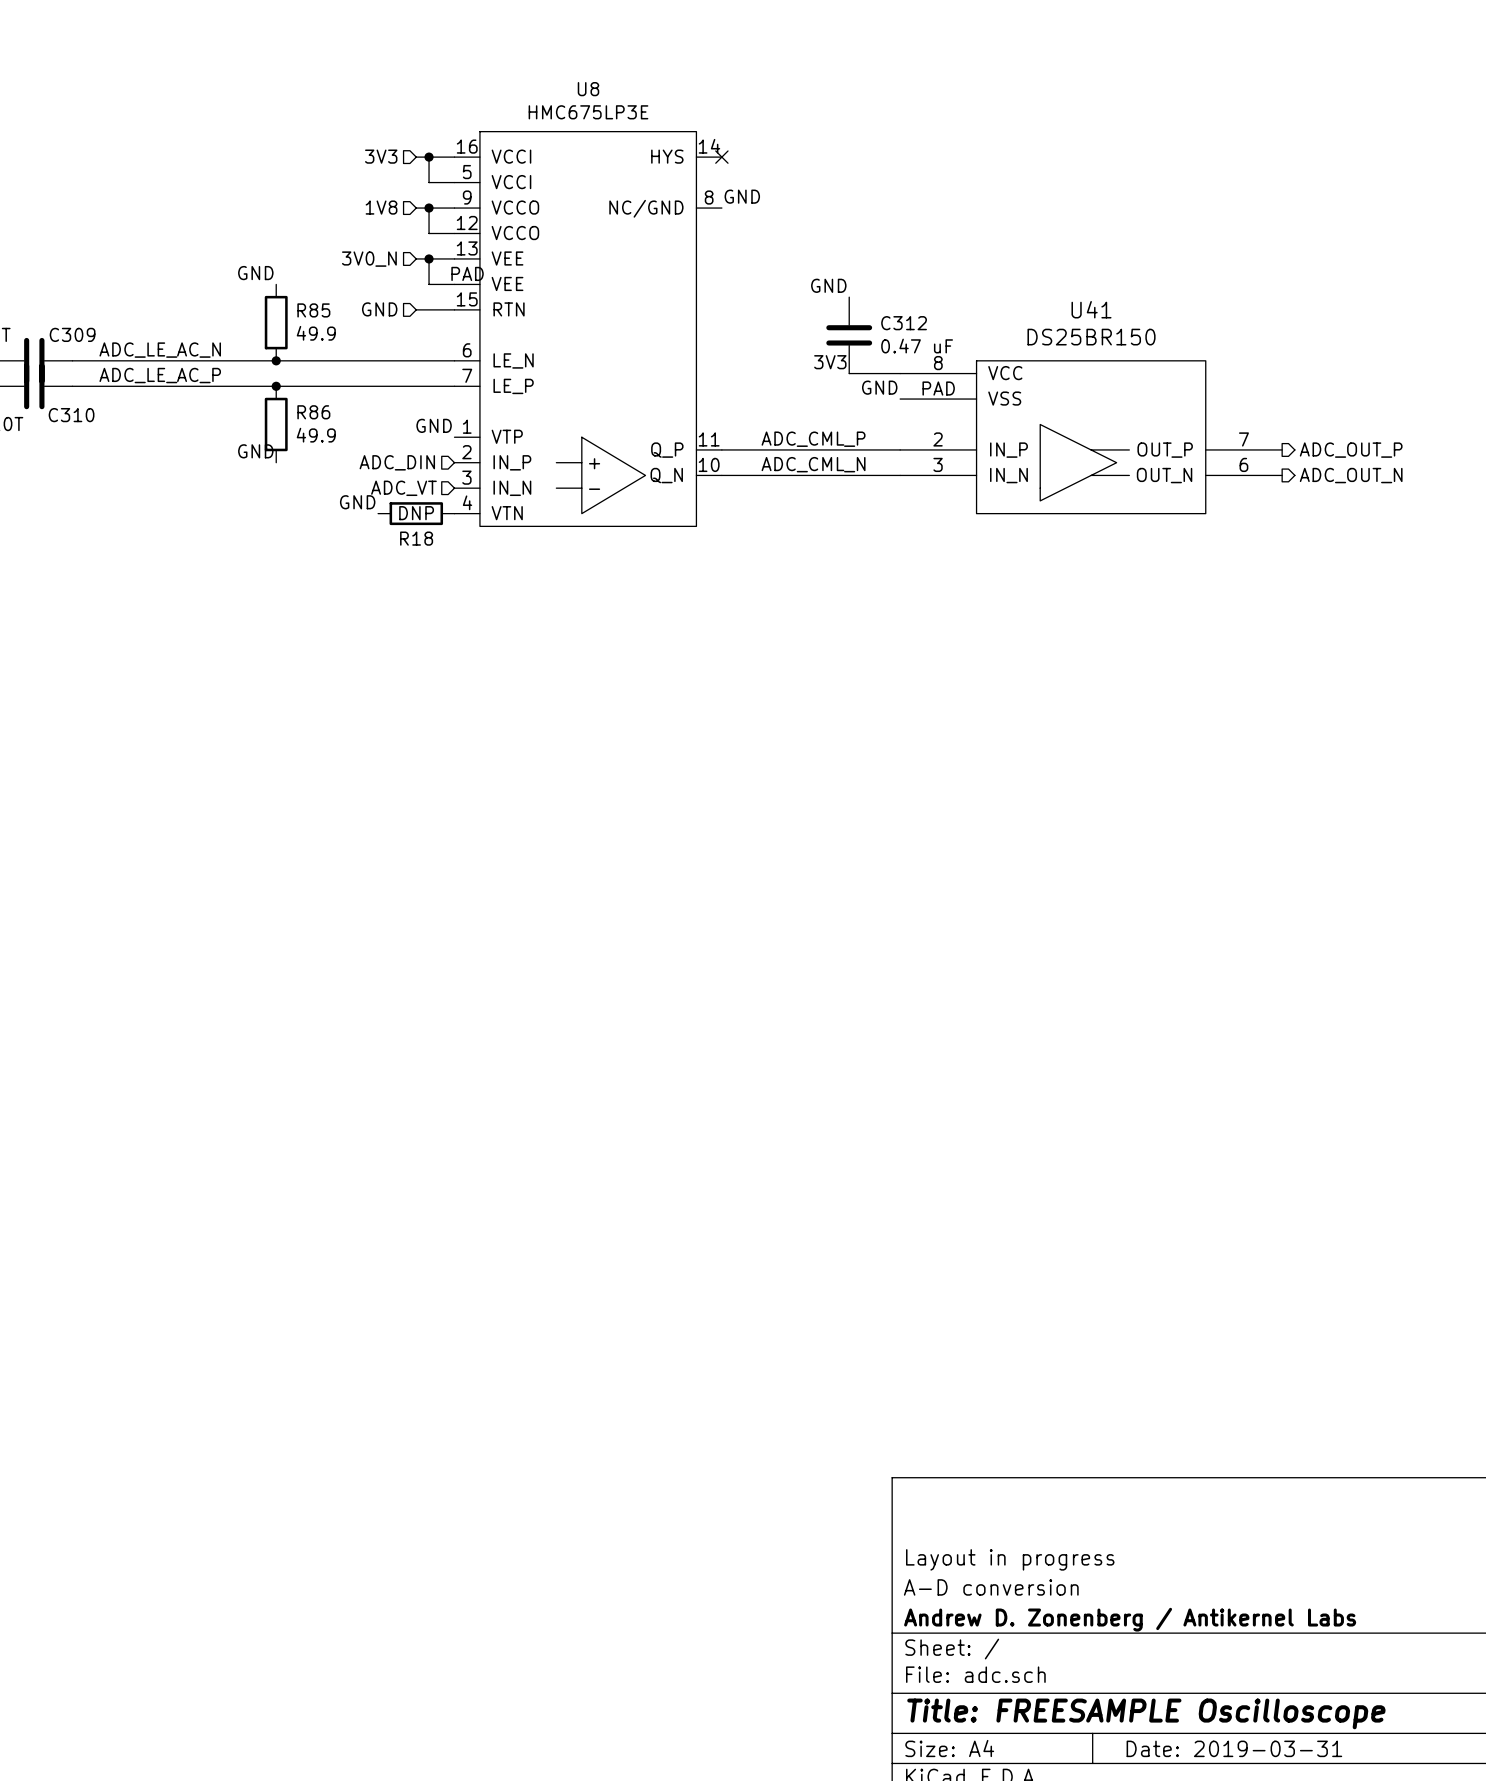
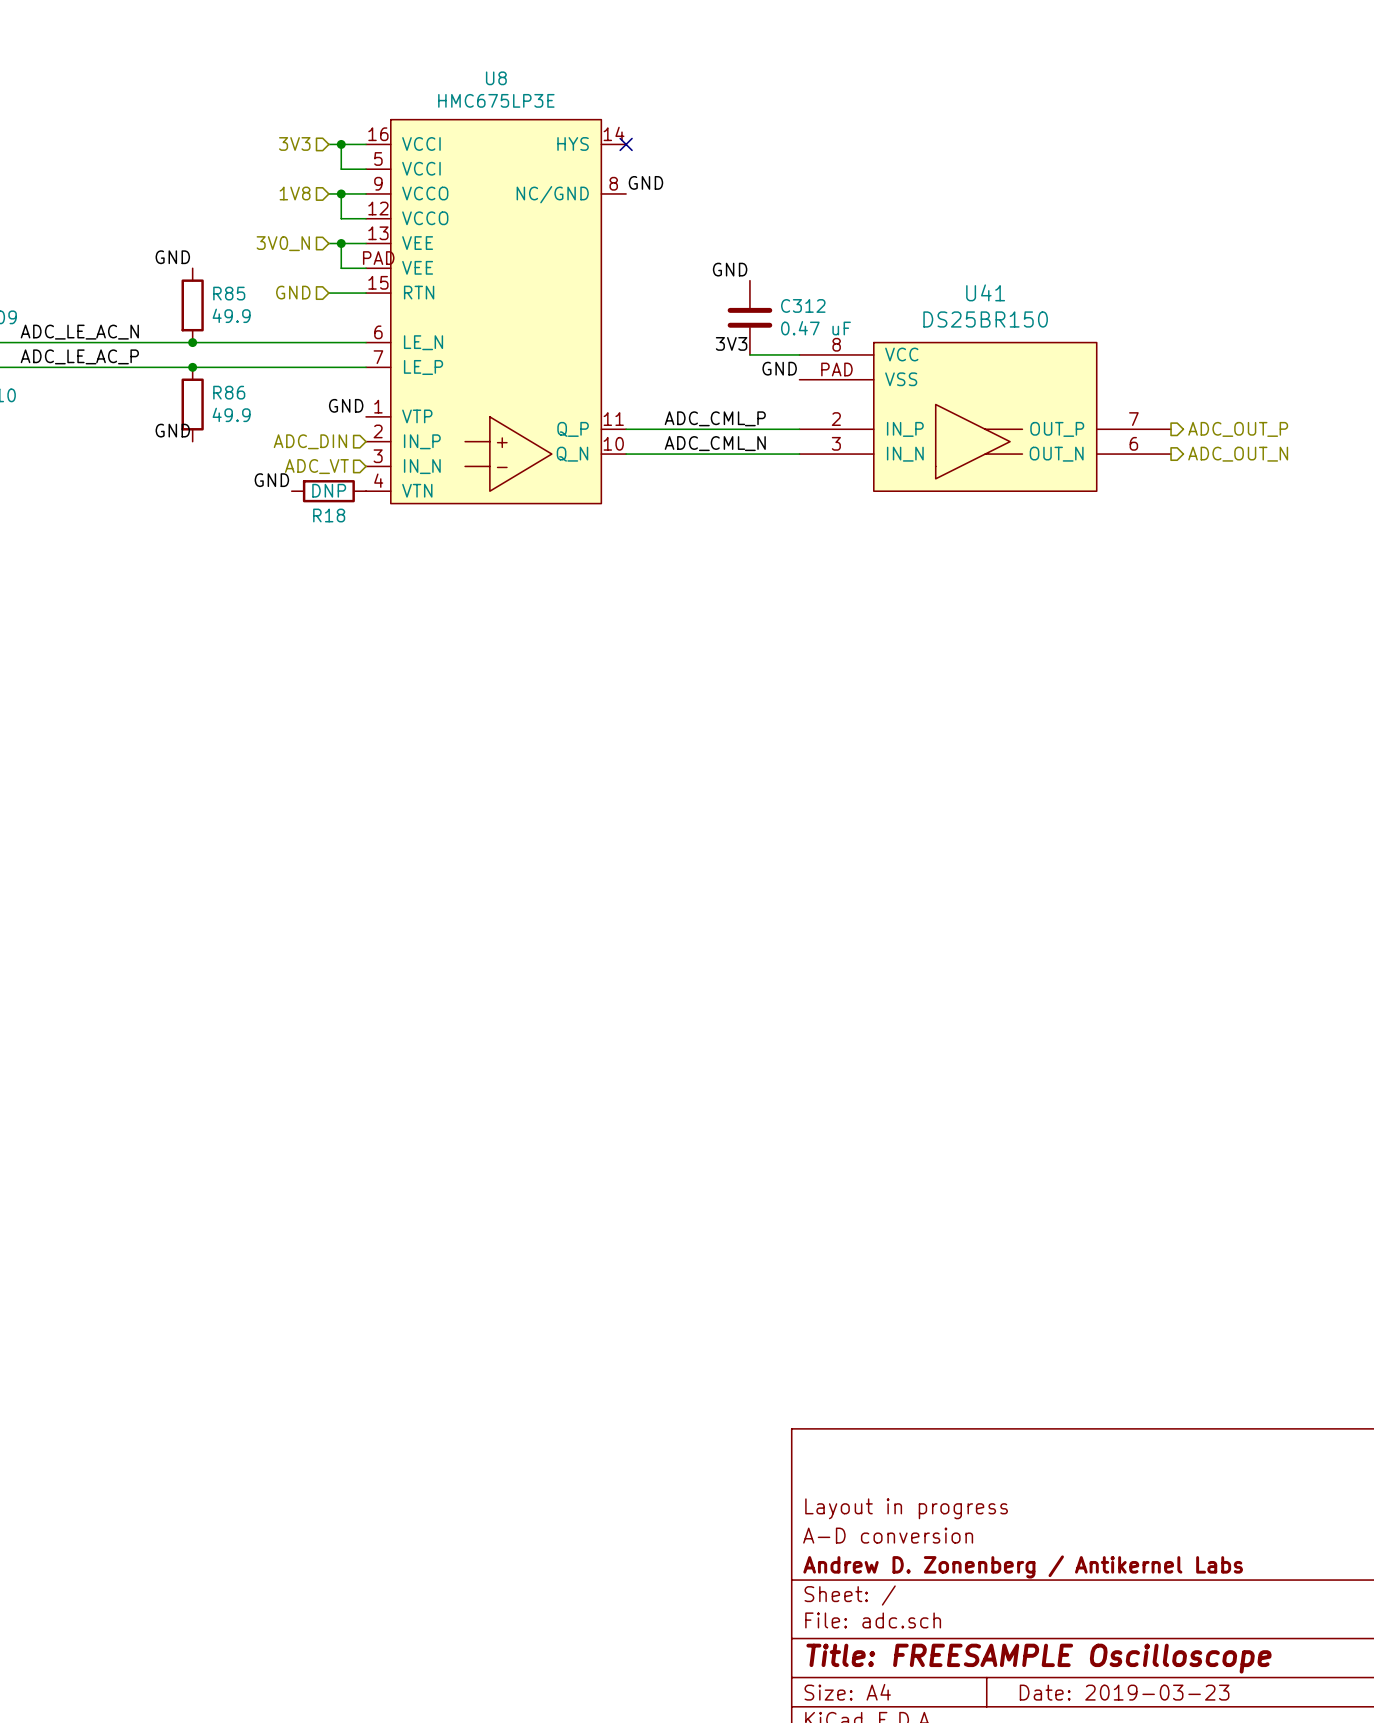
title block: Date: 2019-03-31 (1234, 1748) -> Date: 2019-03-23 (1124, 1692)

